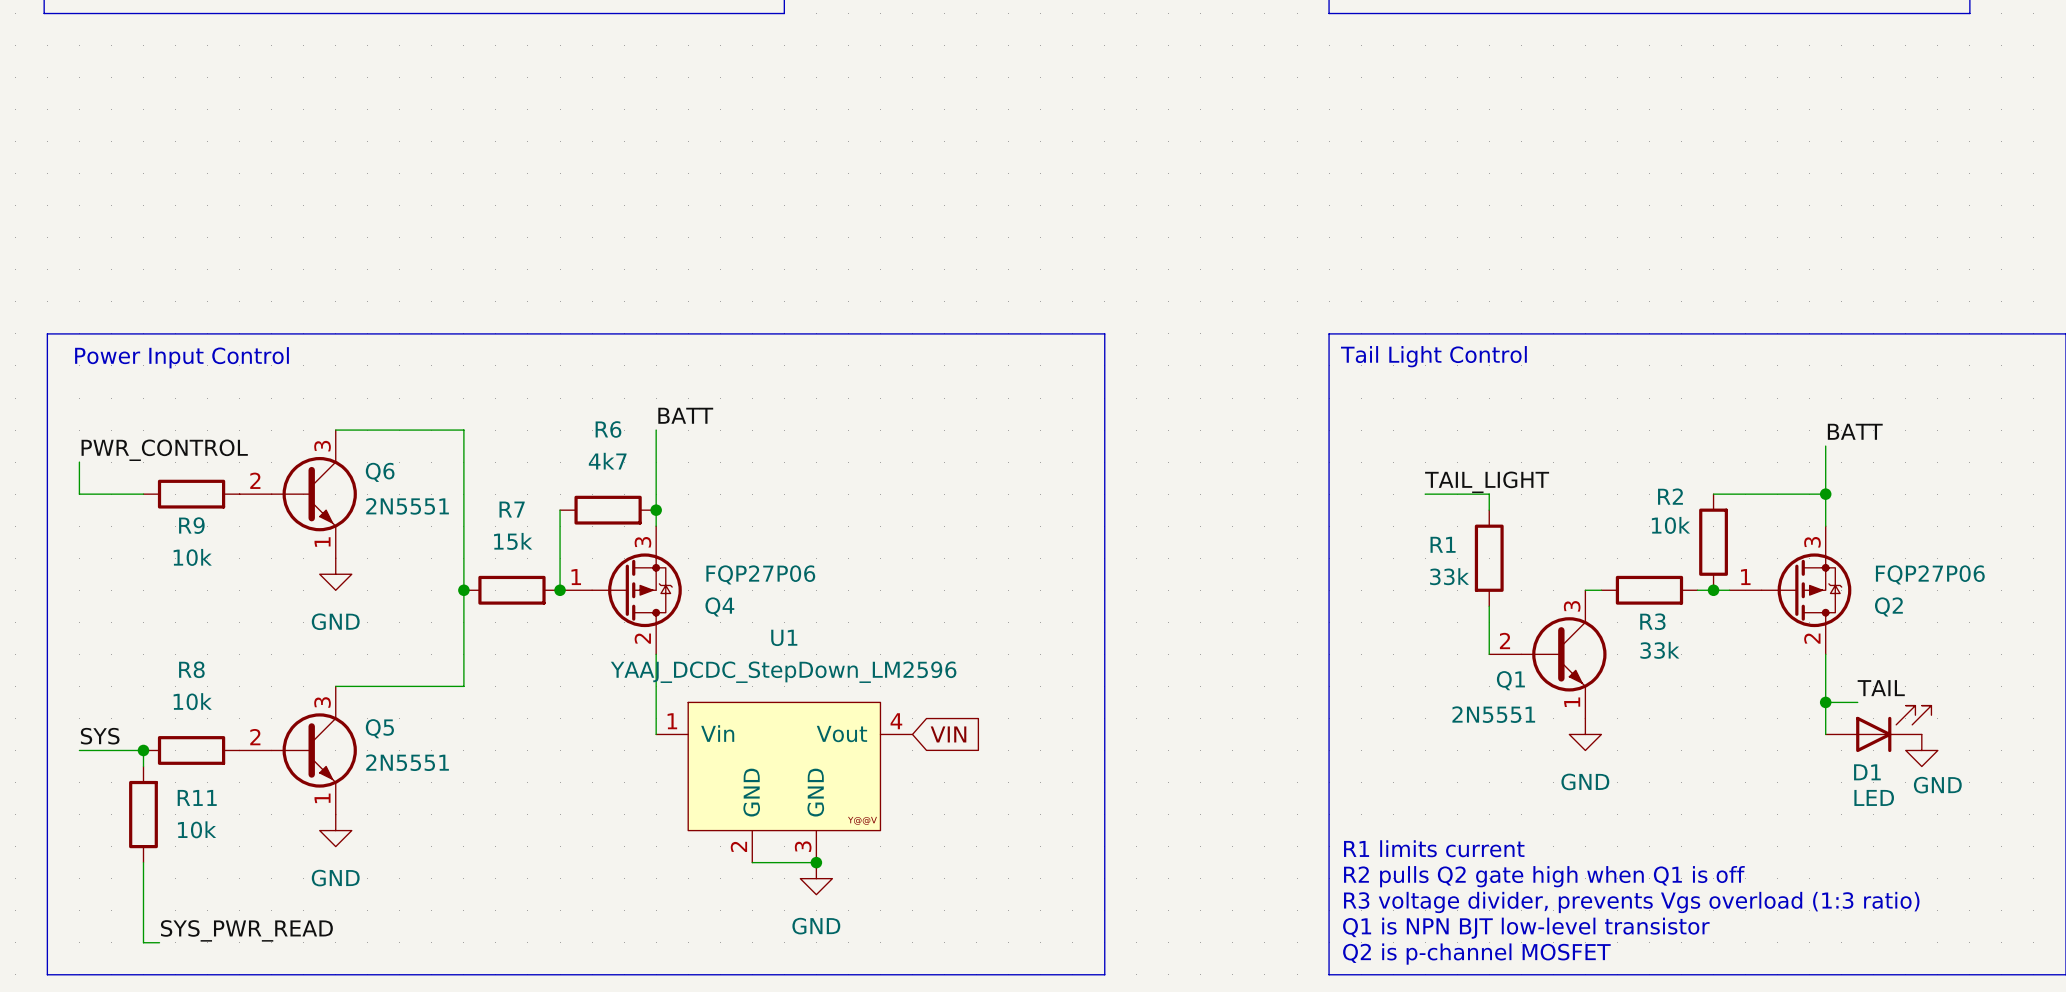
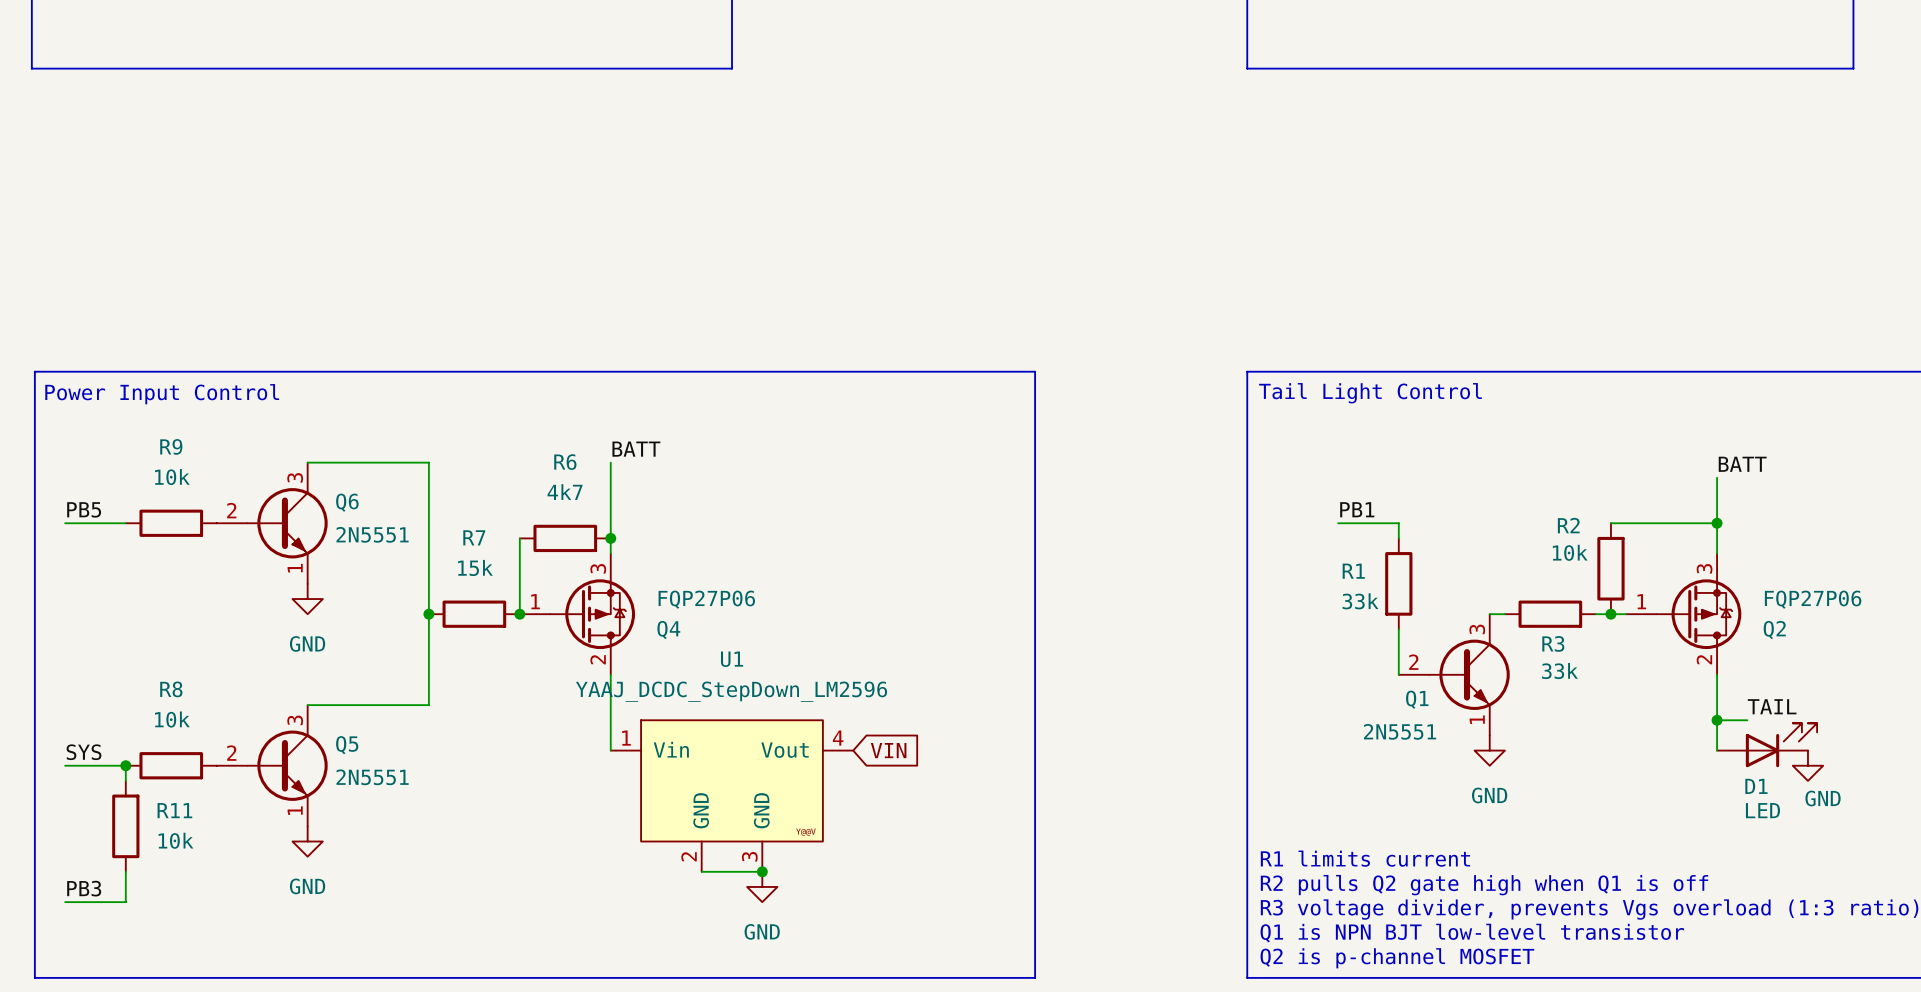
label: PWR_CONTROL (164, 450) -> none
wire: (79, 462) (79, 494) -> none
label: none -> PB5 (84, 509)
label: TAIL_LIGHT (1487, 482) -> PB1 (1357, 509)
R9 name position: R9 (191, 525) -> R9 (171, 446)
R9 value position: 10k (192, 557) -> 10k (172, 477)
label: none -> PB3 (84, 888)
wire: (143, 894) (143, 942) (159, 942) -> (125, 902) (65, 902)
label: SYS_PWR_READ (246, 930) -> none

